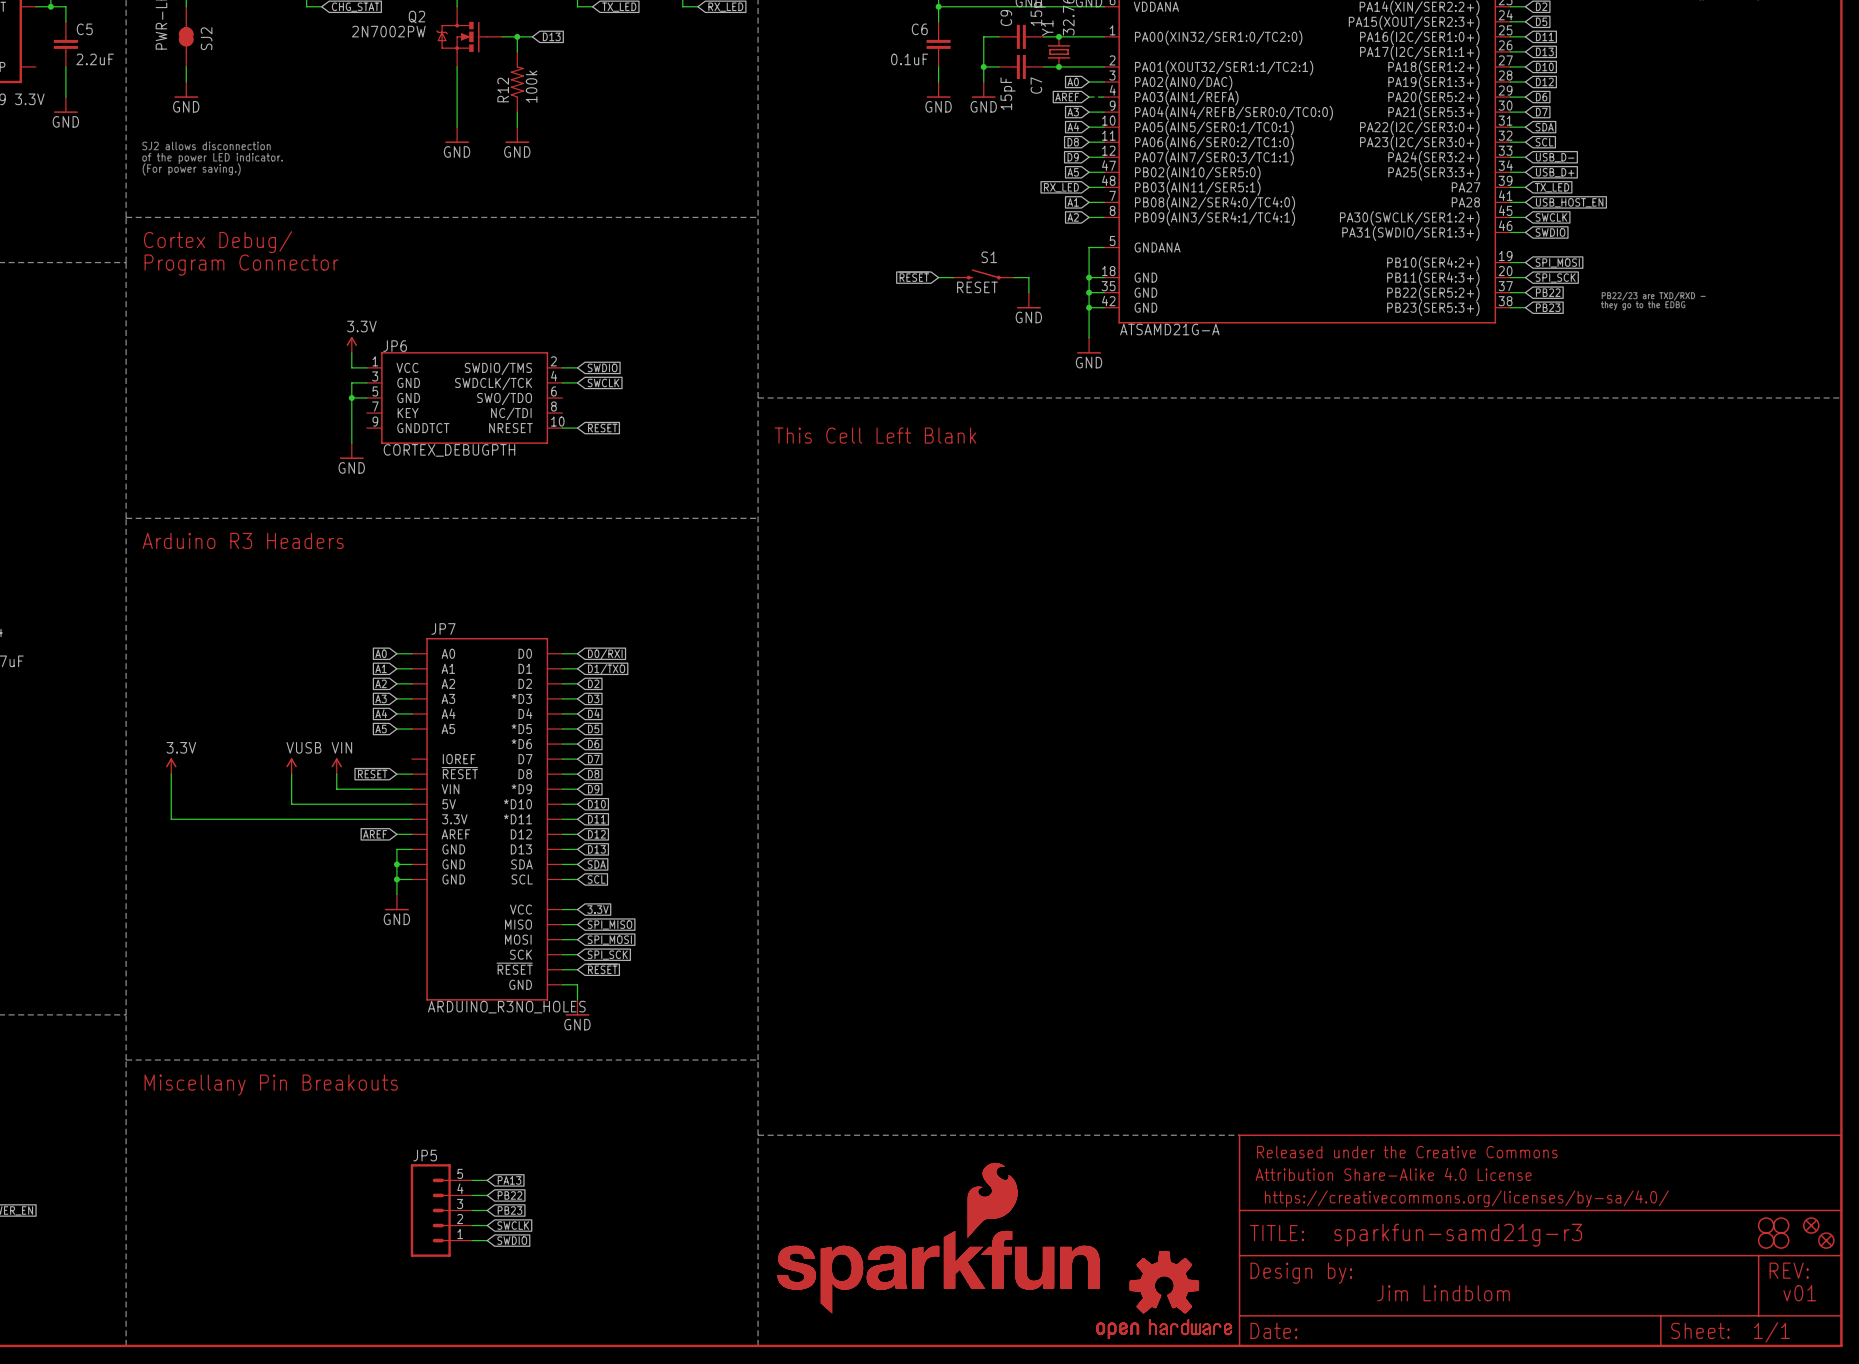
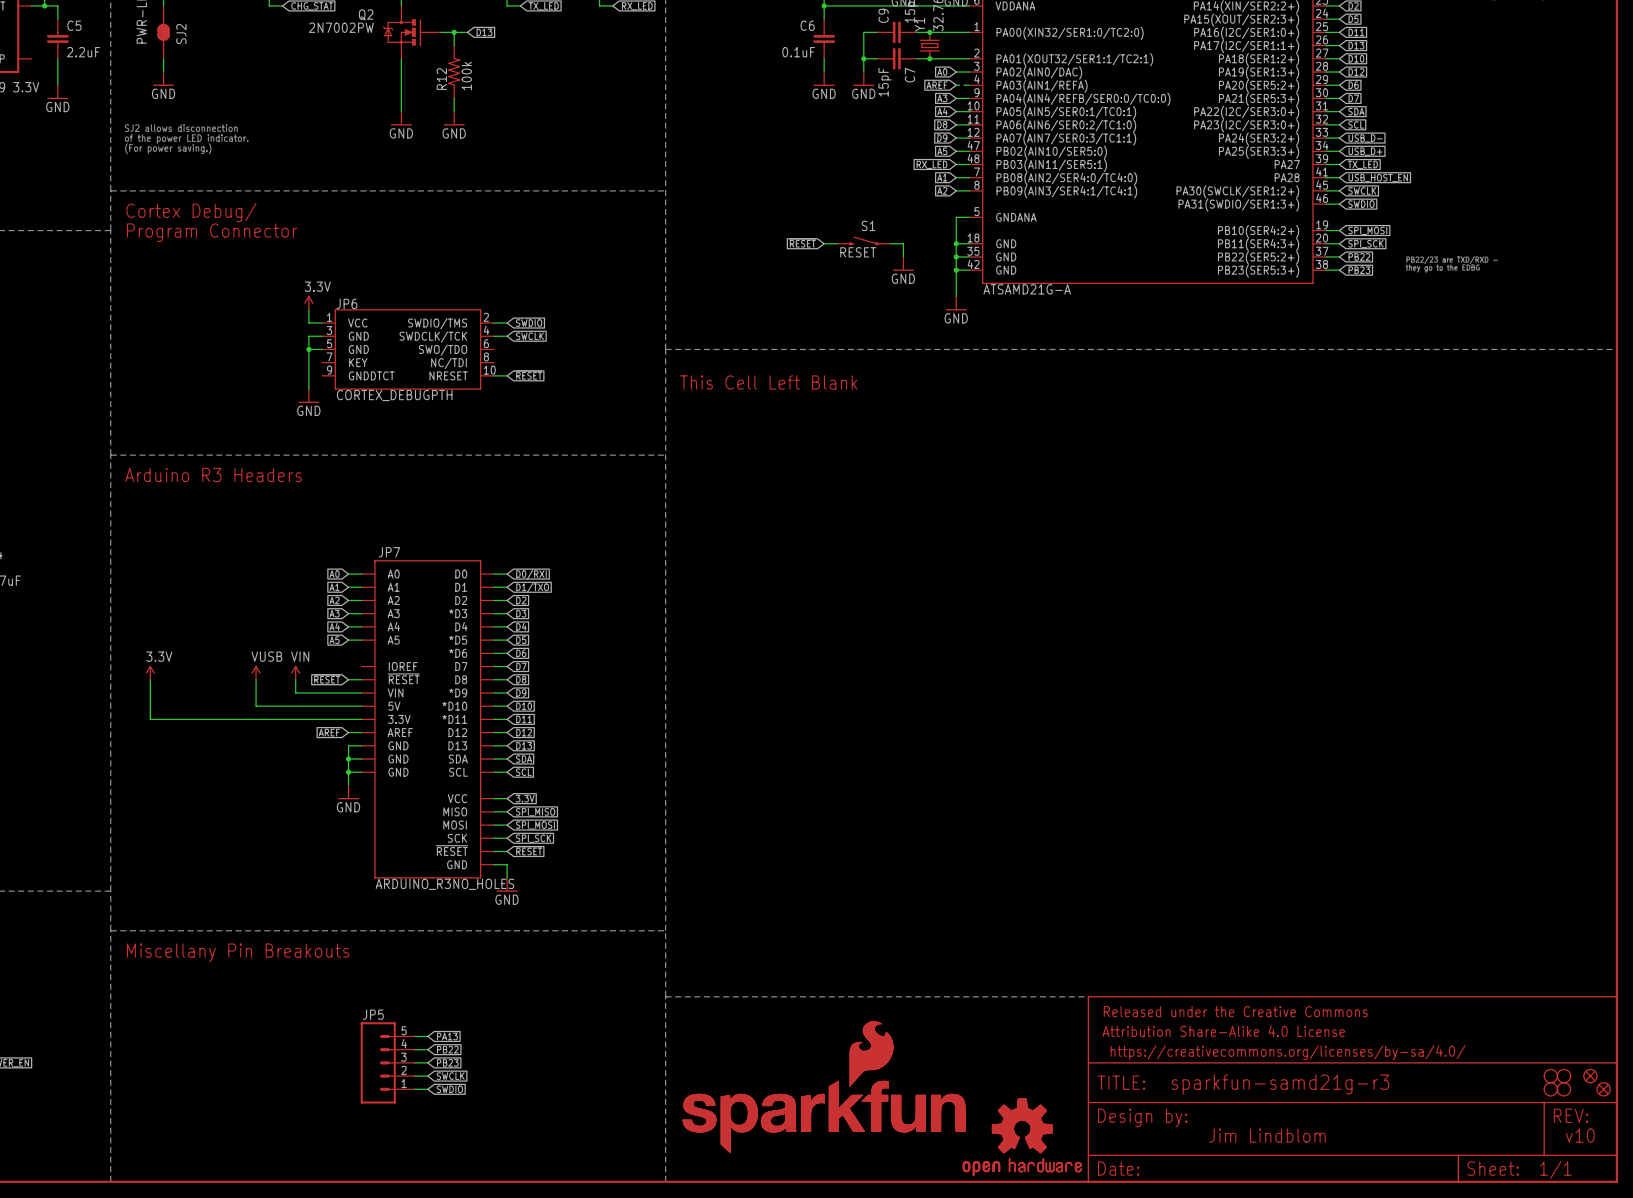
text: v01 (1799, 1293) -> v10 (1580, 1135)

